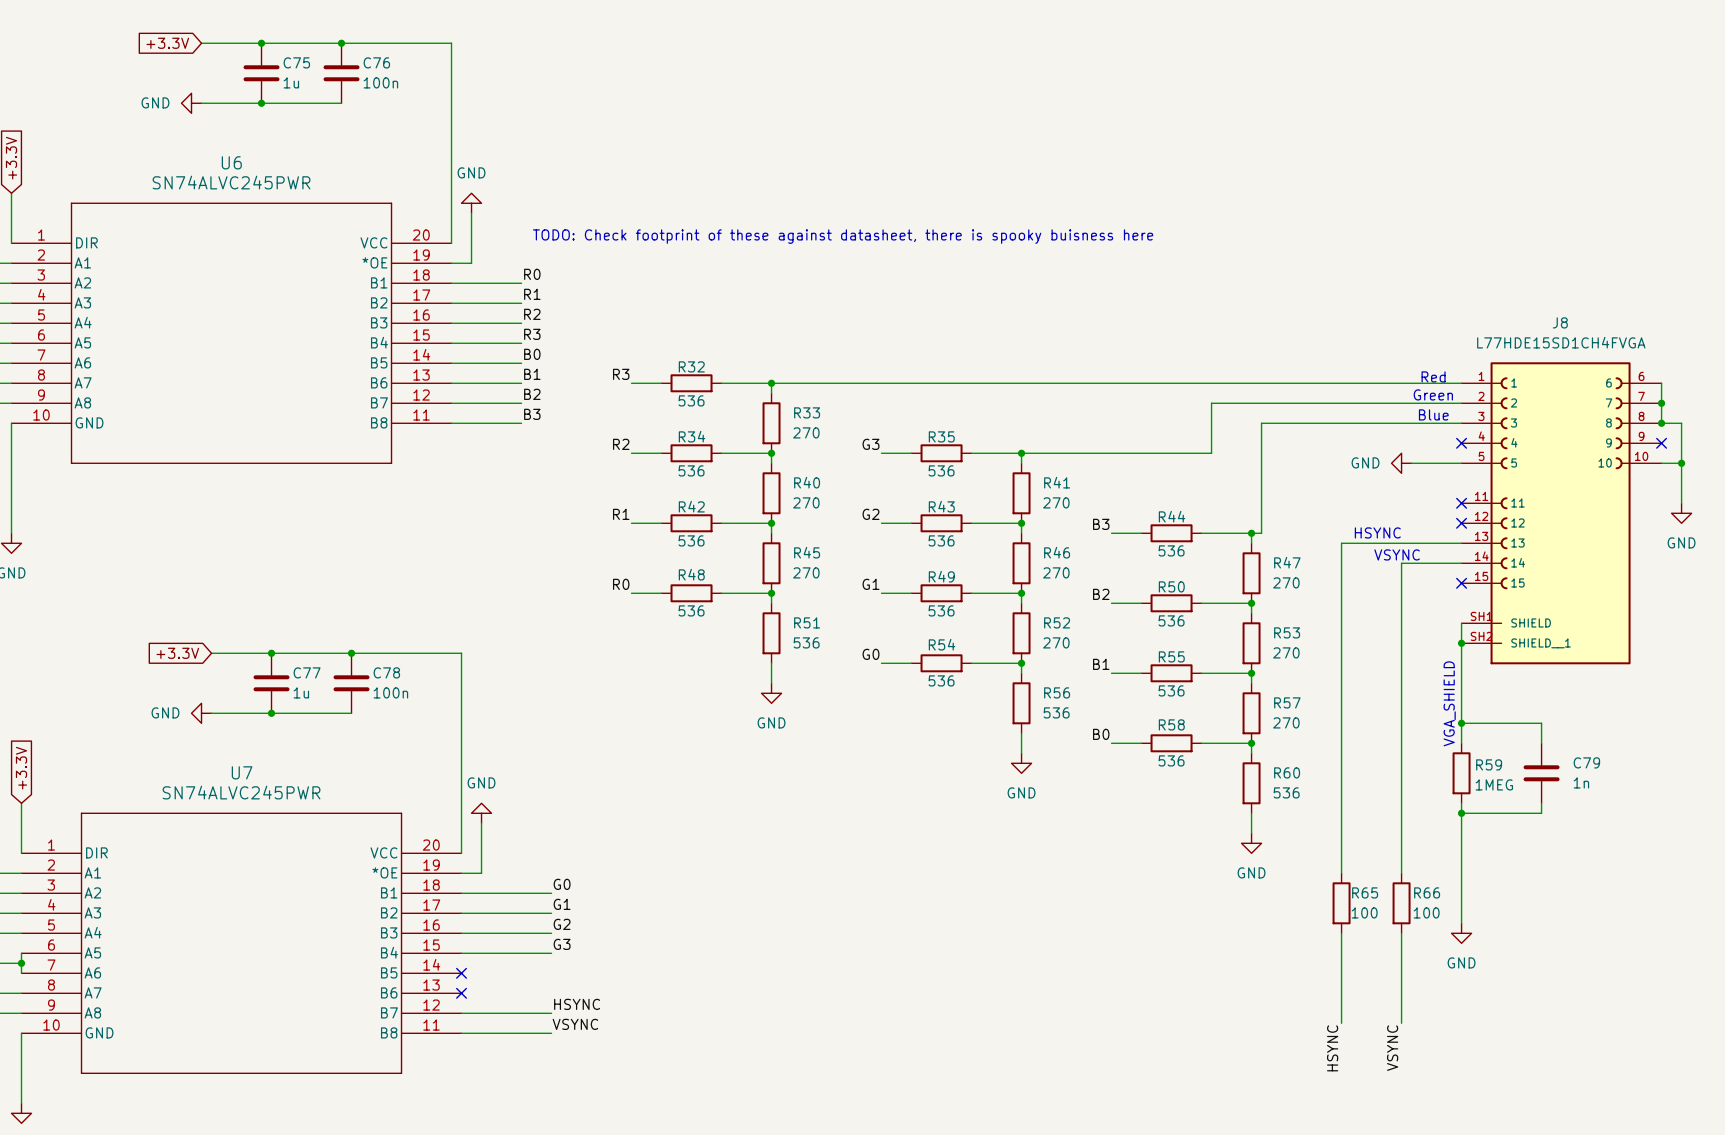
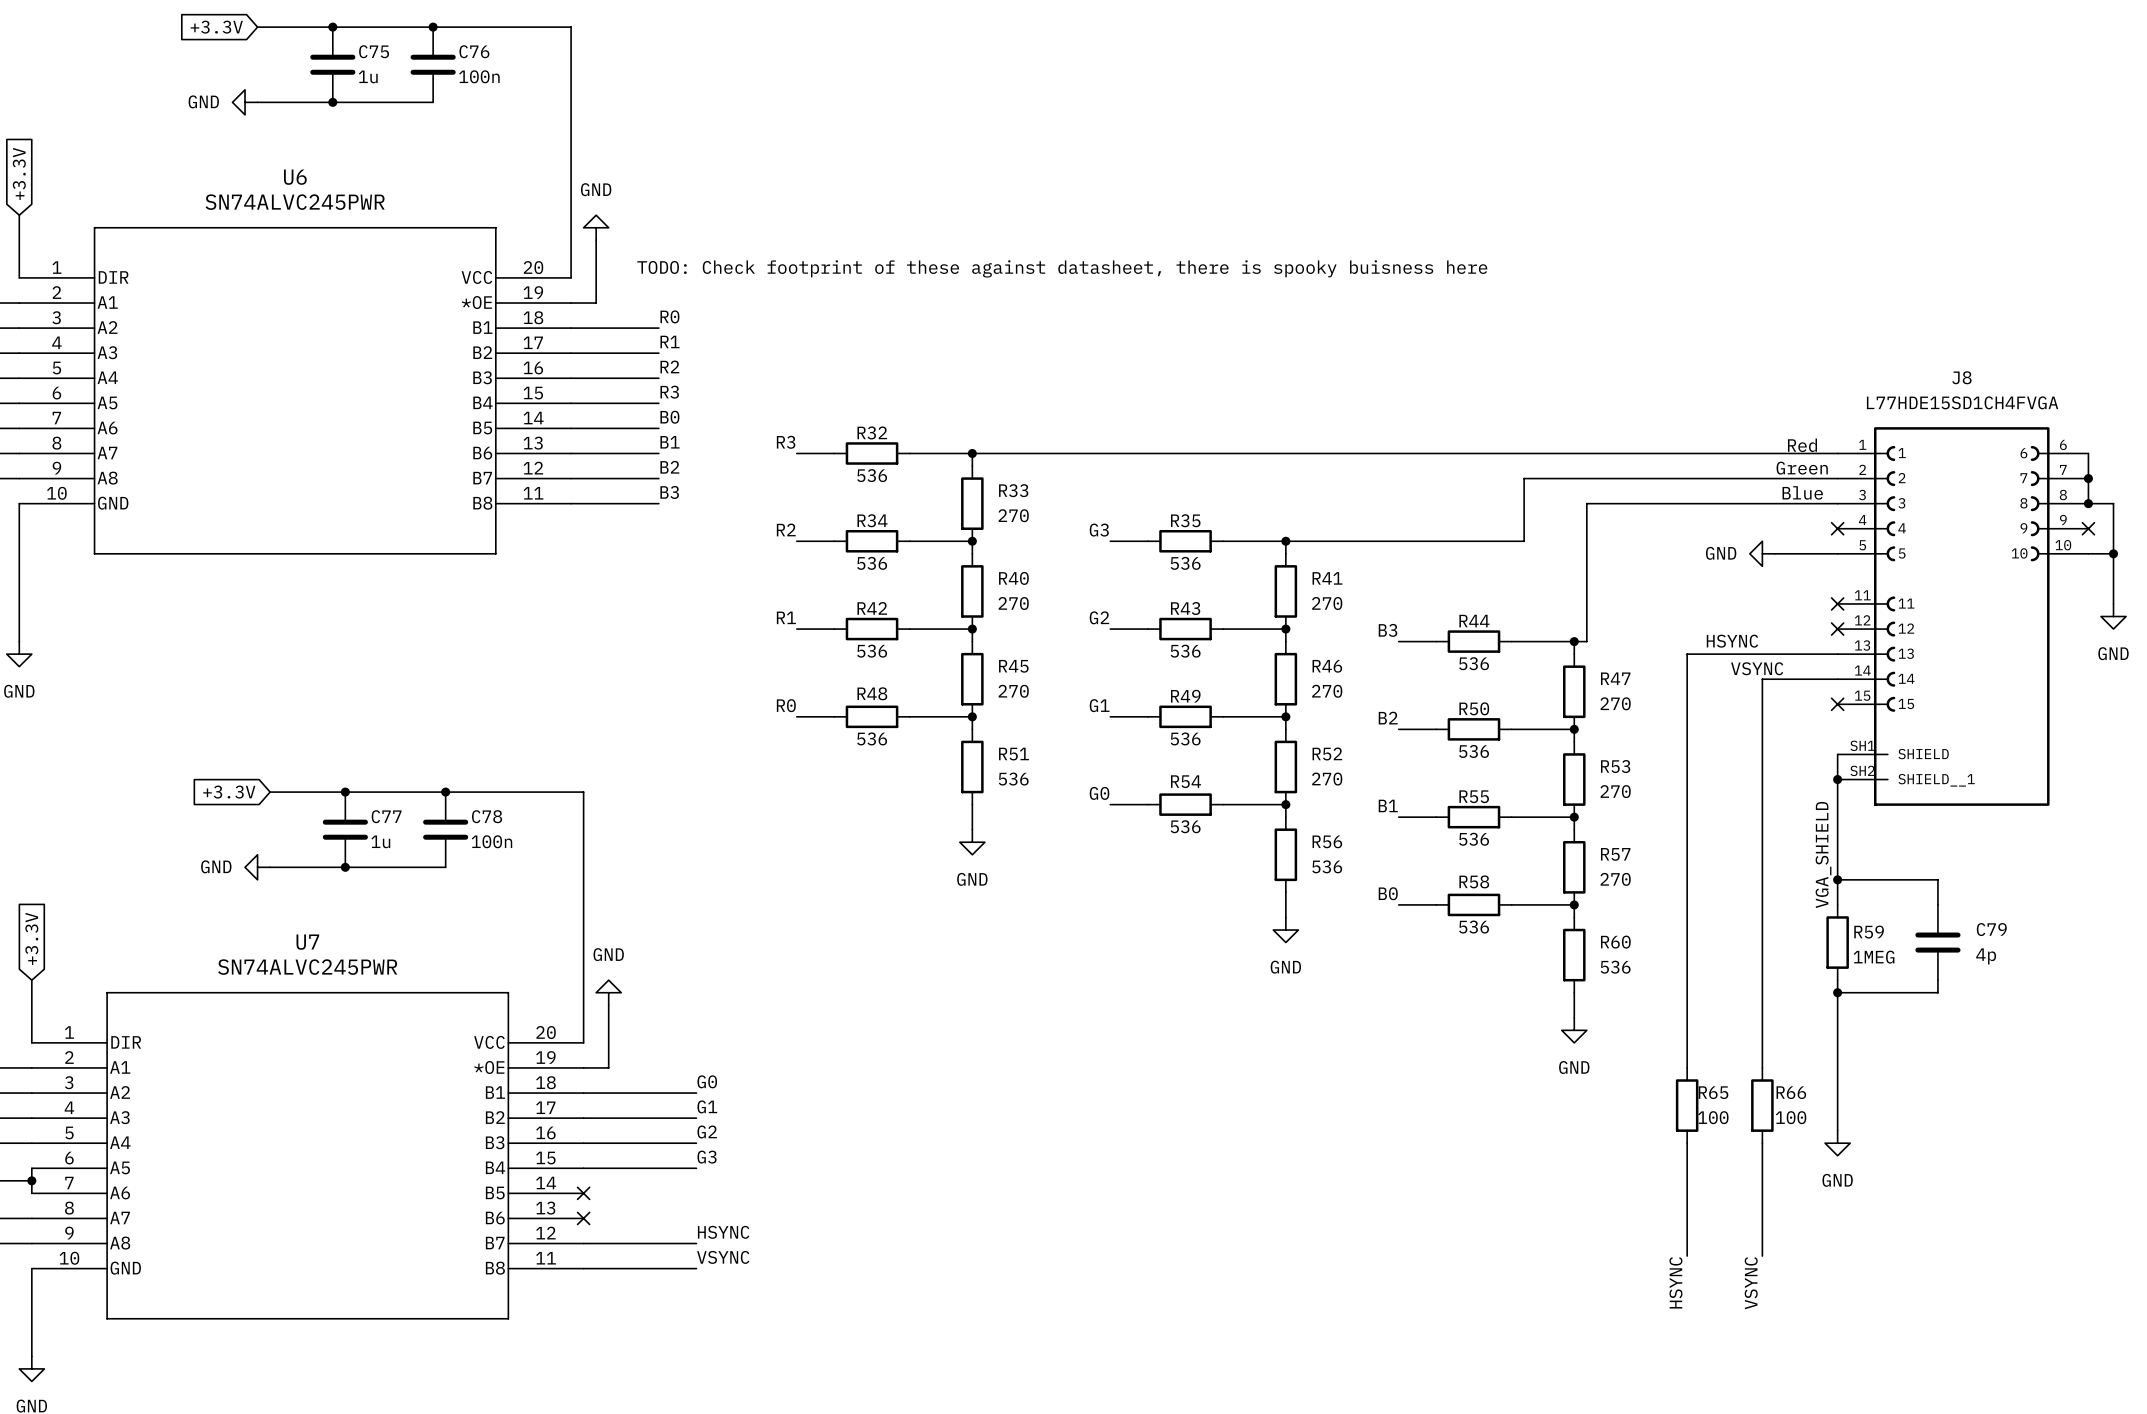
C79 value: 1n (1581, 782) -> 4p (1986, 956)

